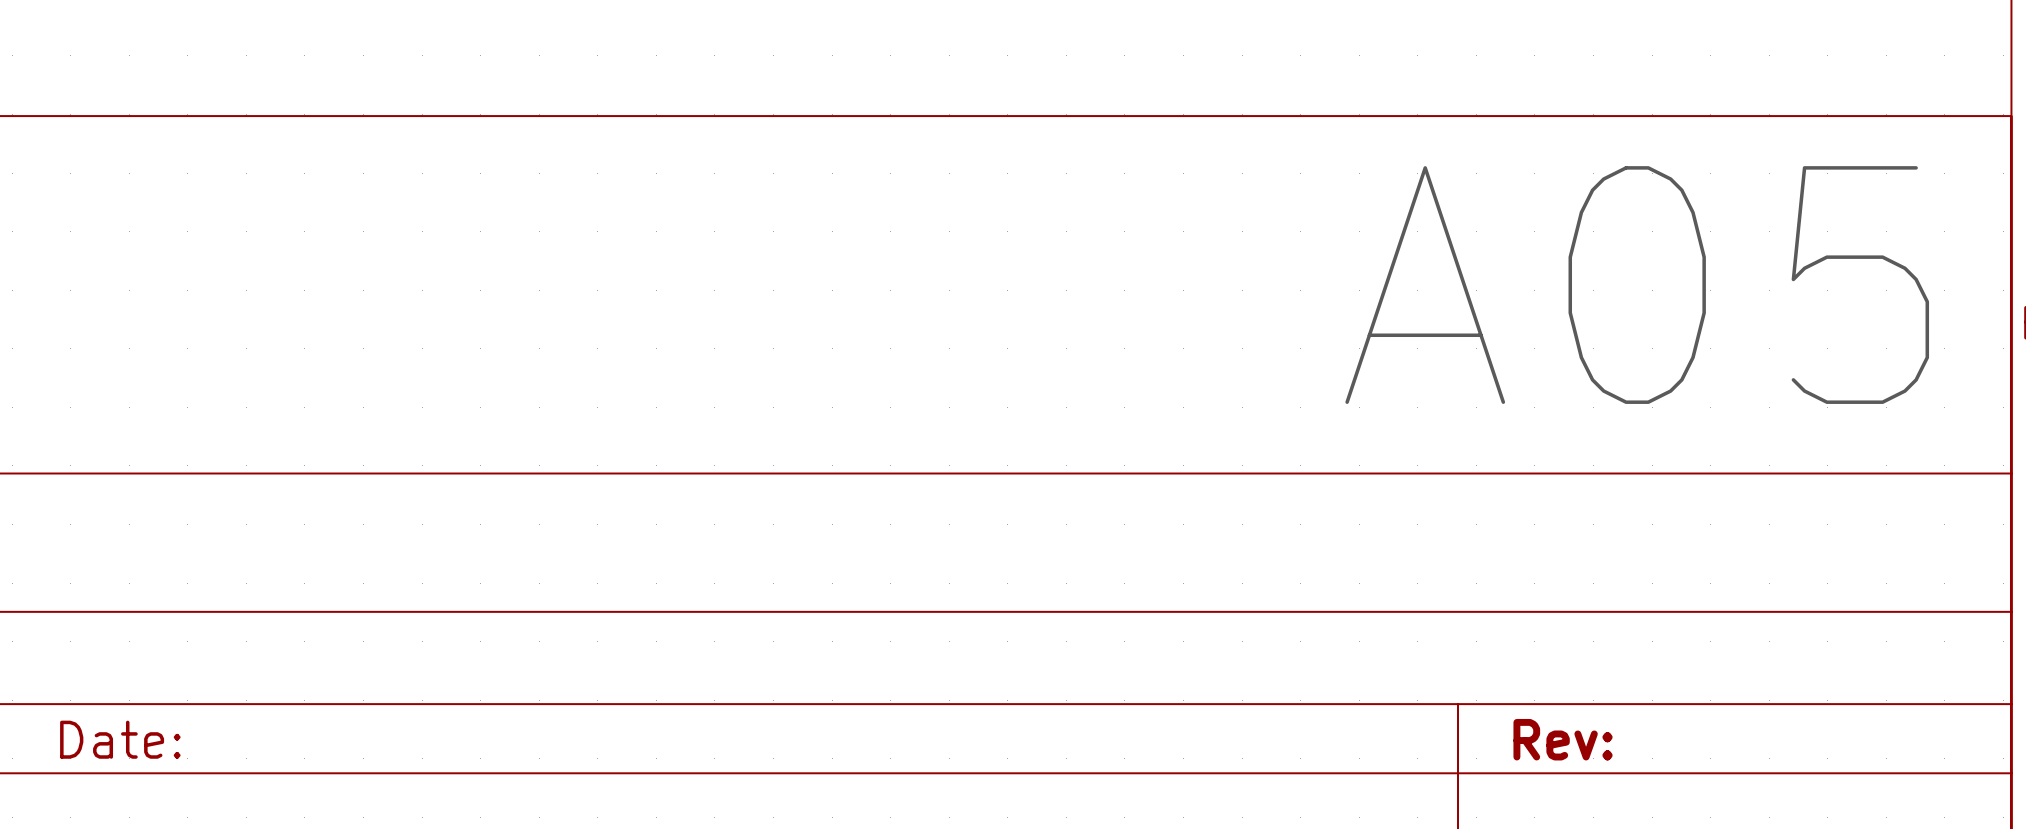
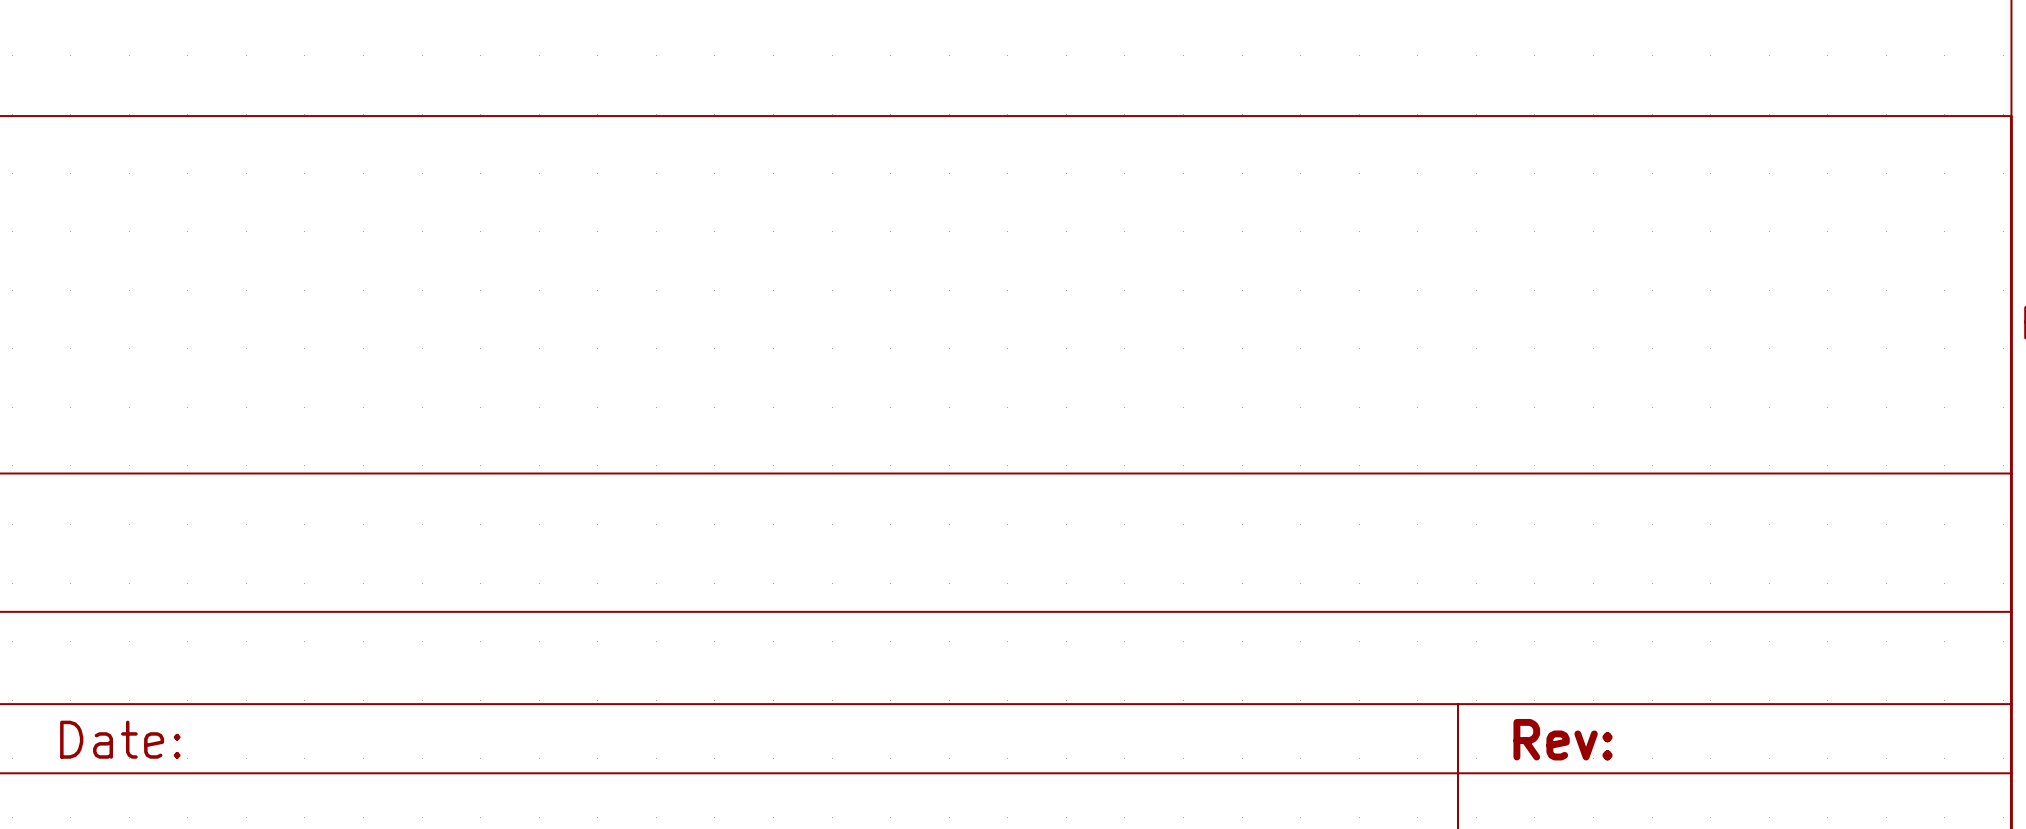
text: A05 (1637, 285) -> none

